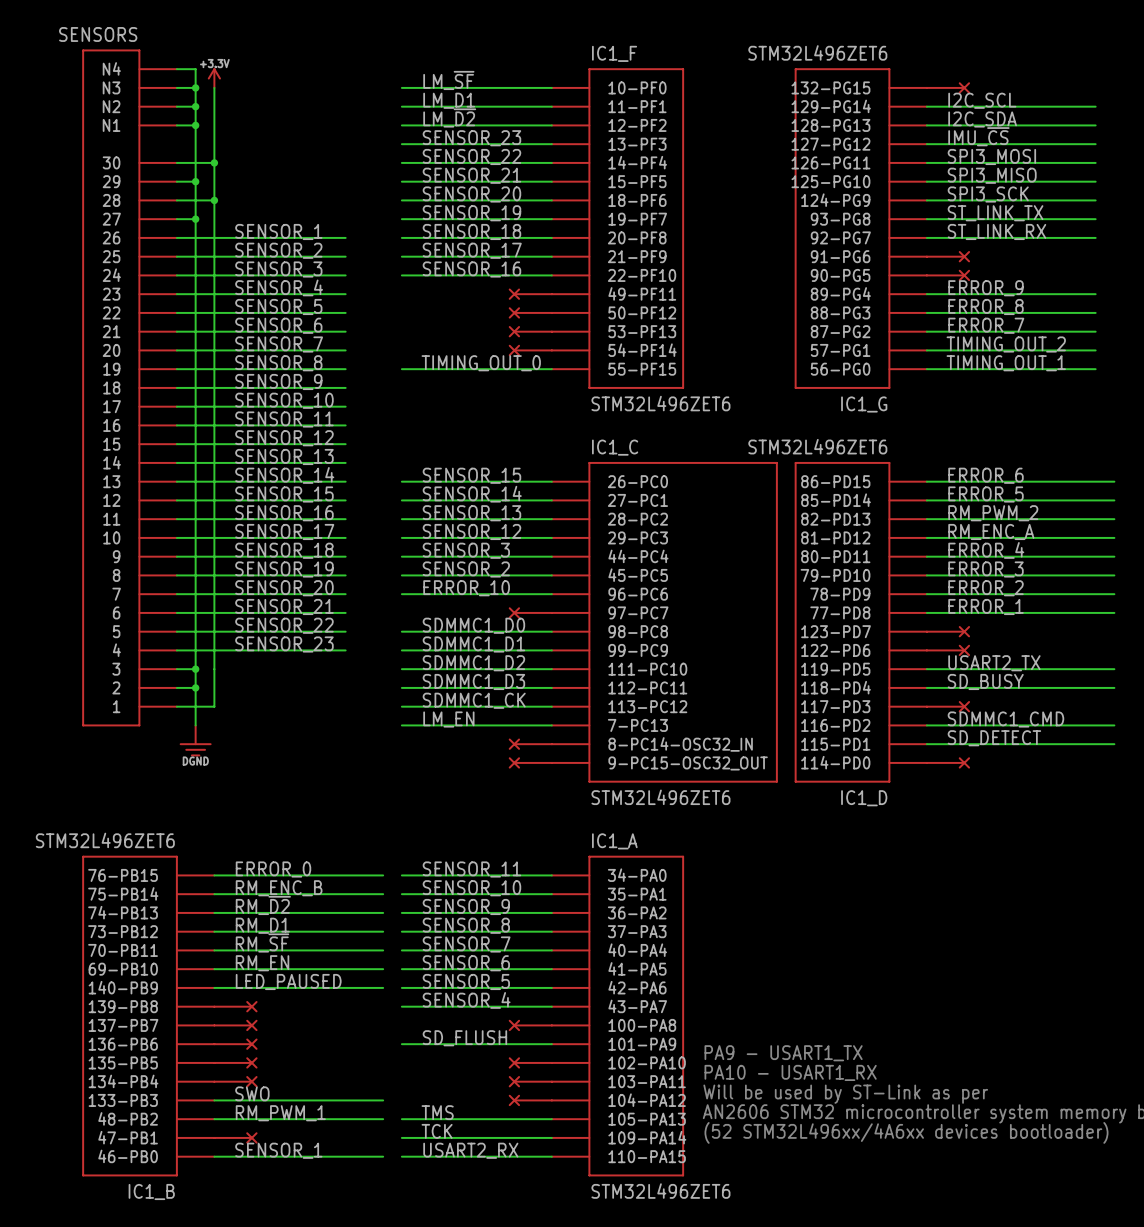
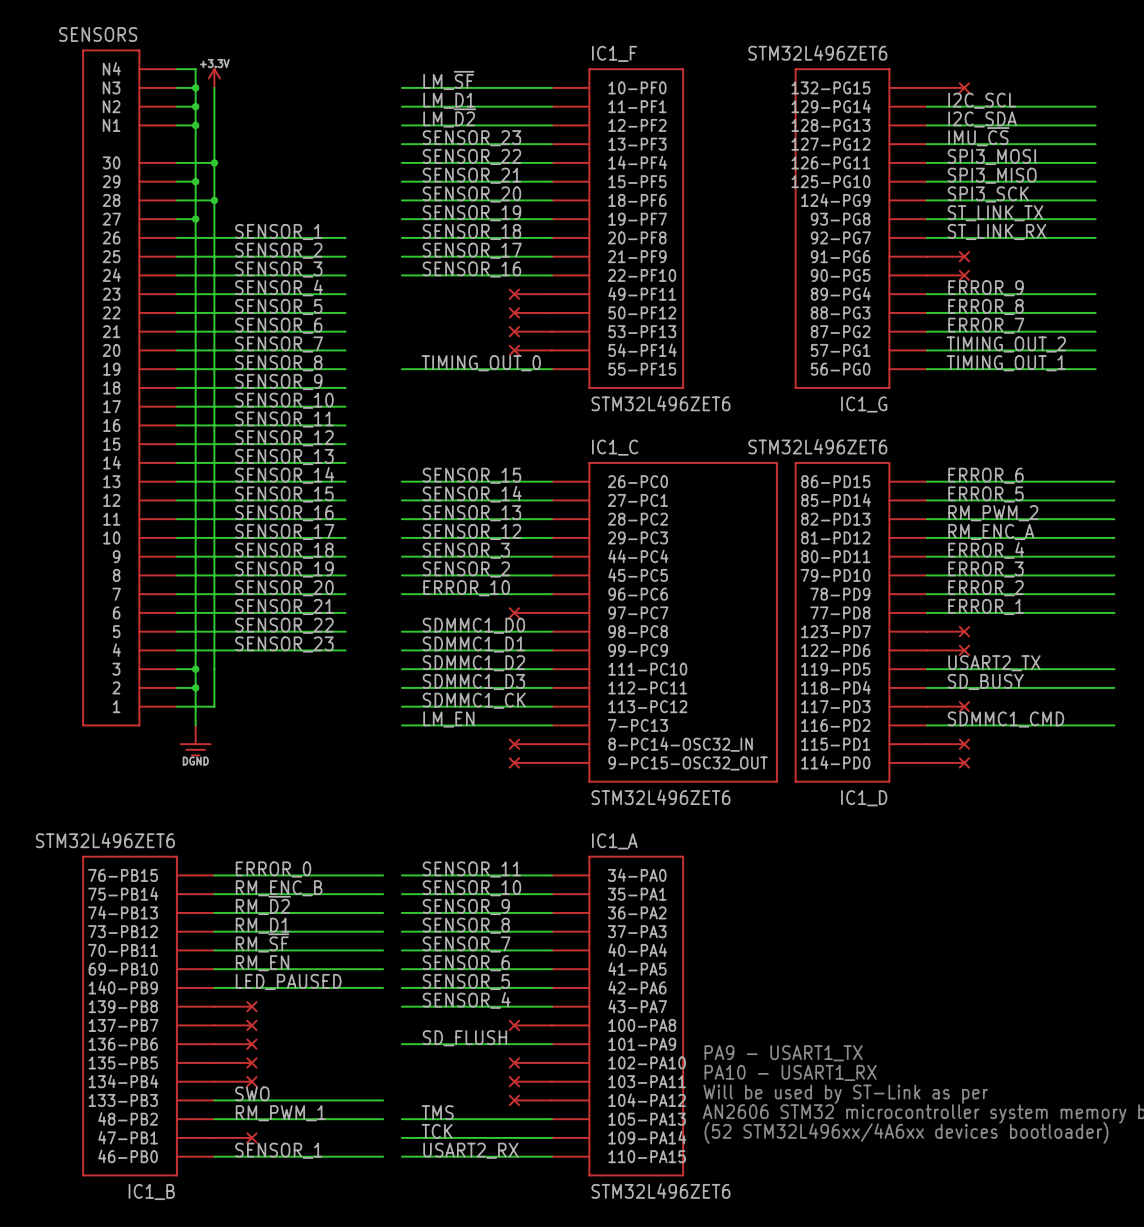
label: SD_DETECT (994, 738) -> none
wire: (926, 744) (1114, 744) -> none
part: none -> (948, 744)

